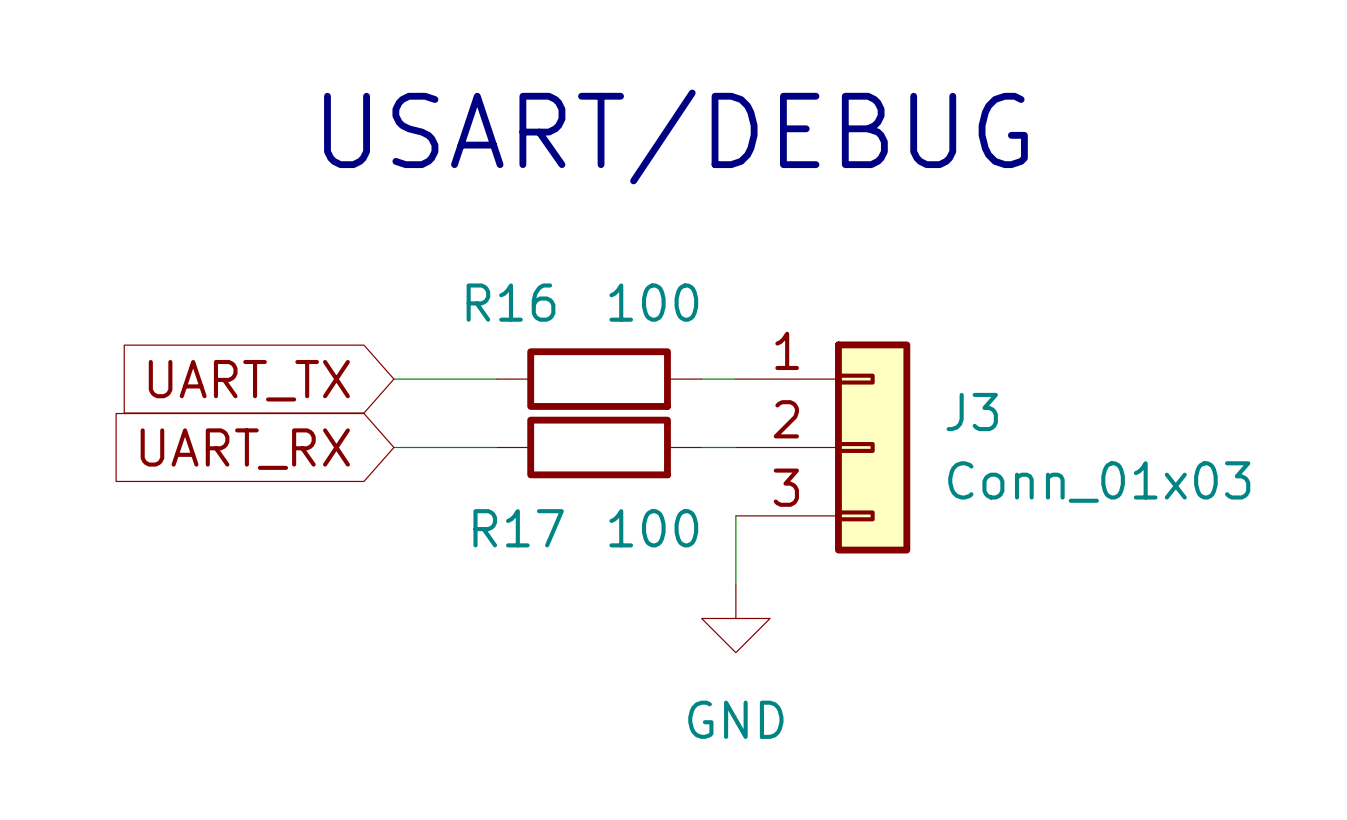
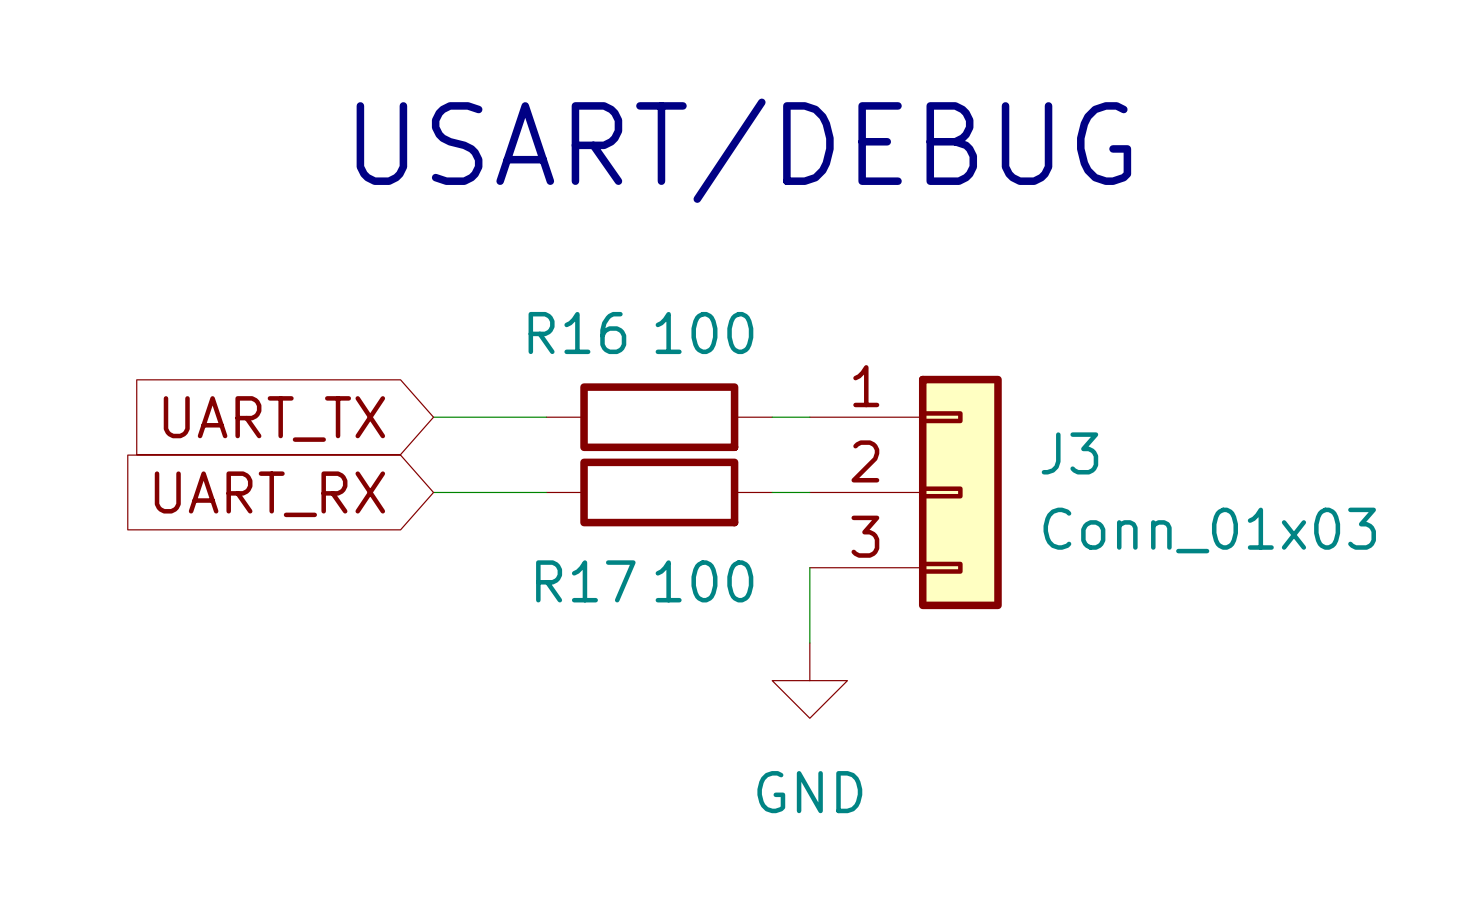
R16 name position: R16 (510, 302) -> R16 (577, 333)
R16 value position: 100 (653, 302) -> 100 (704, 333)
R17 name position: R17 (518, 528) -> R17 (585, 581)
R17 value position: 100 (653, 528) -> 100 (704, 581)

